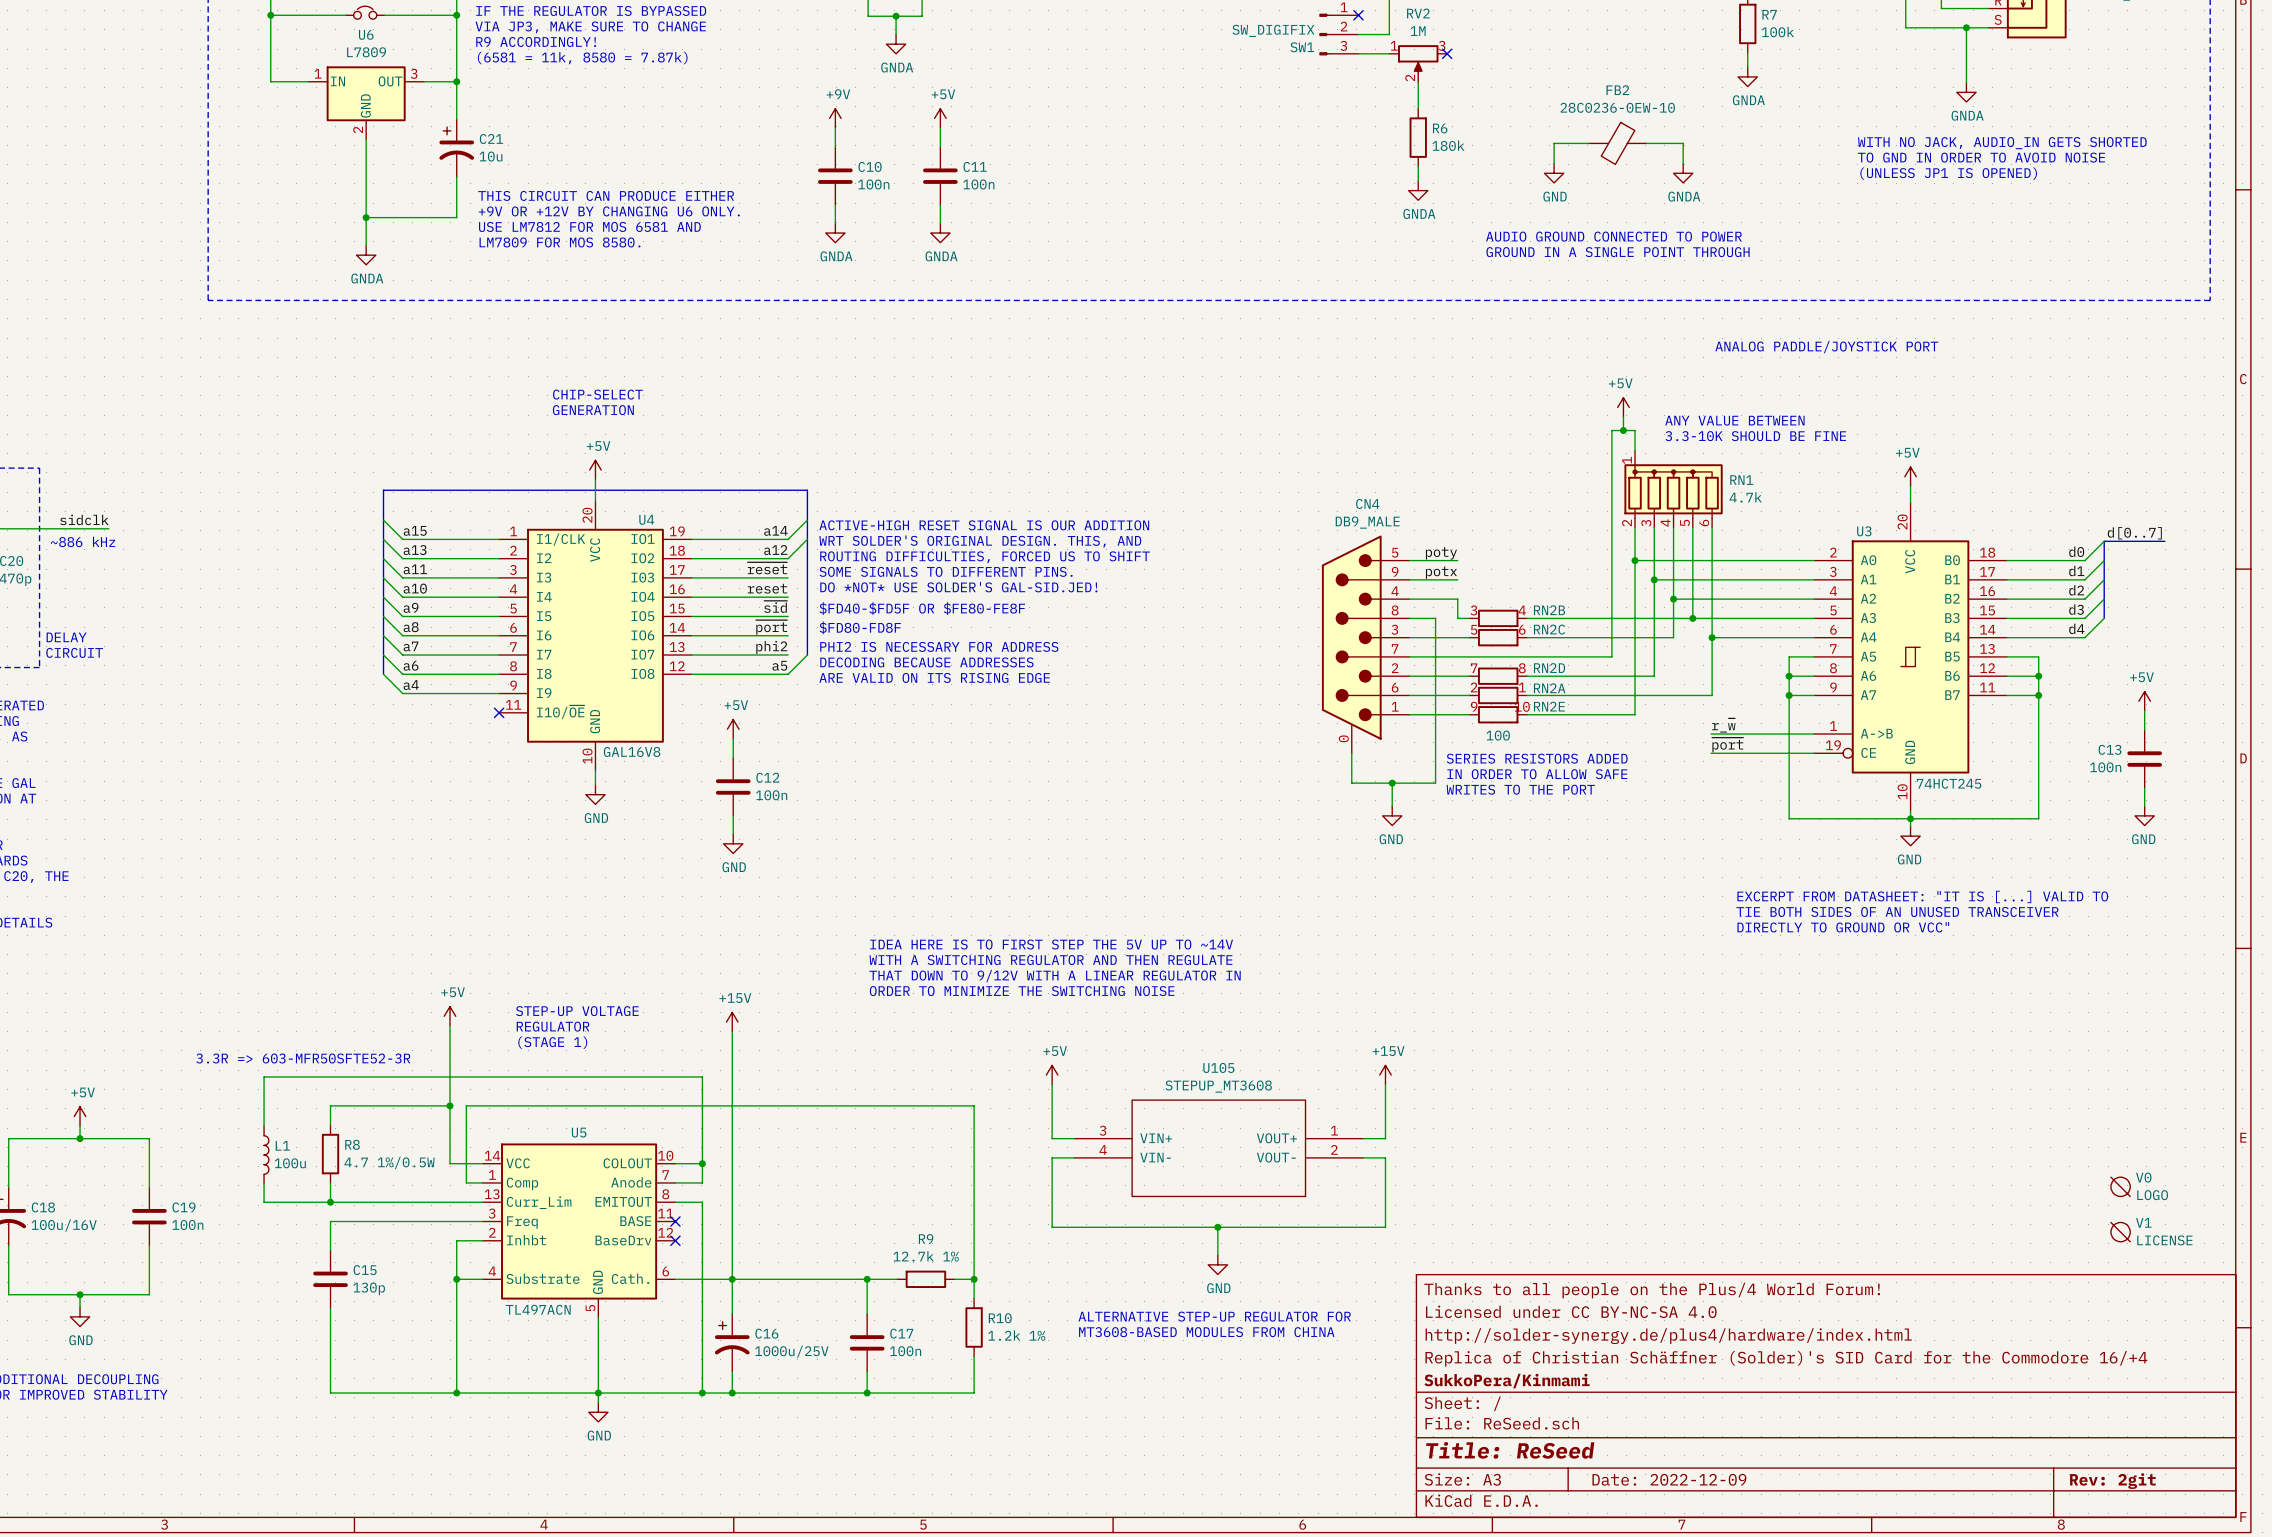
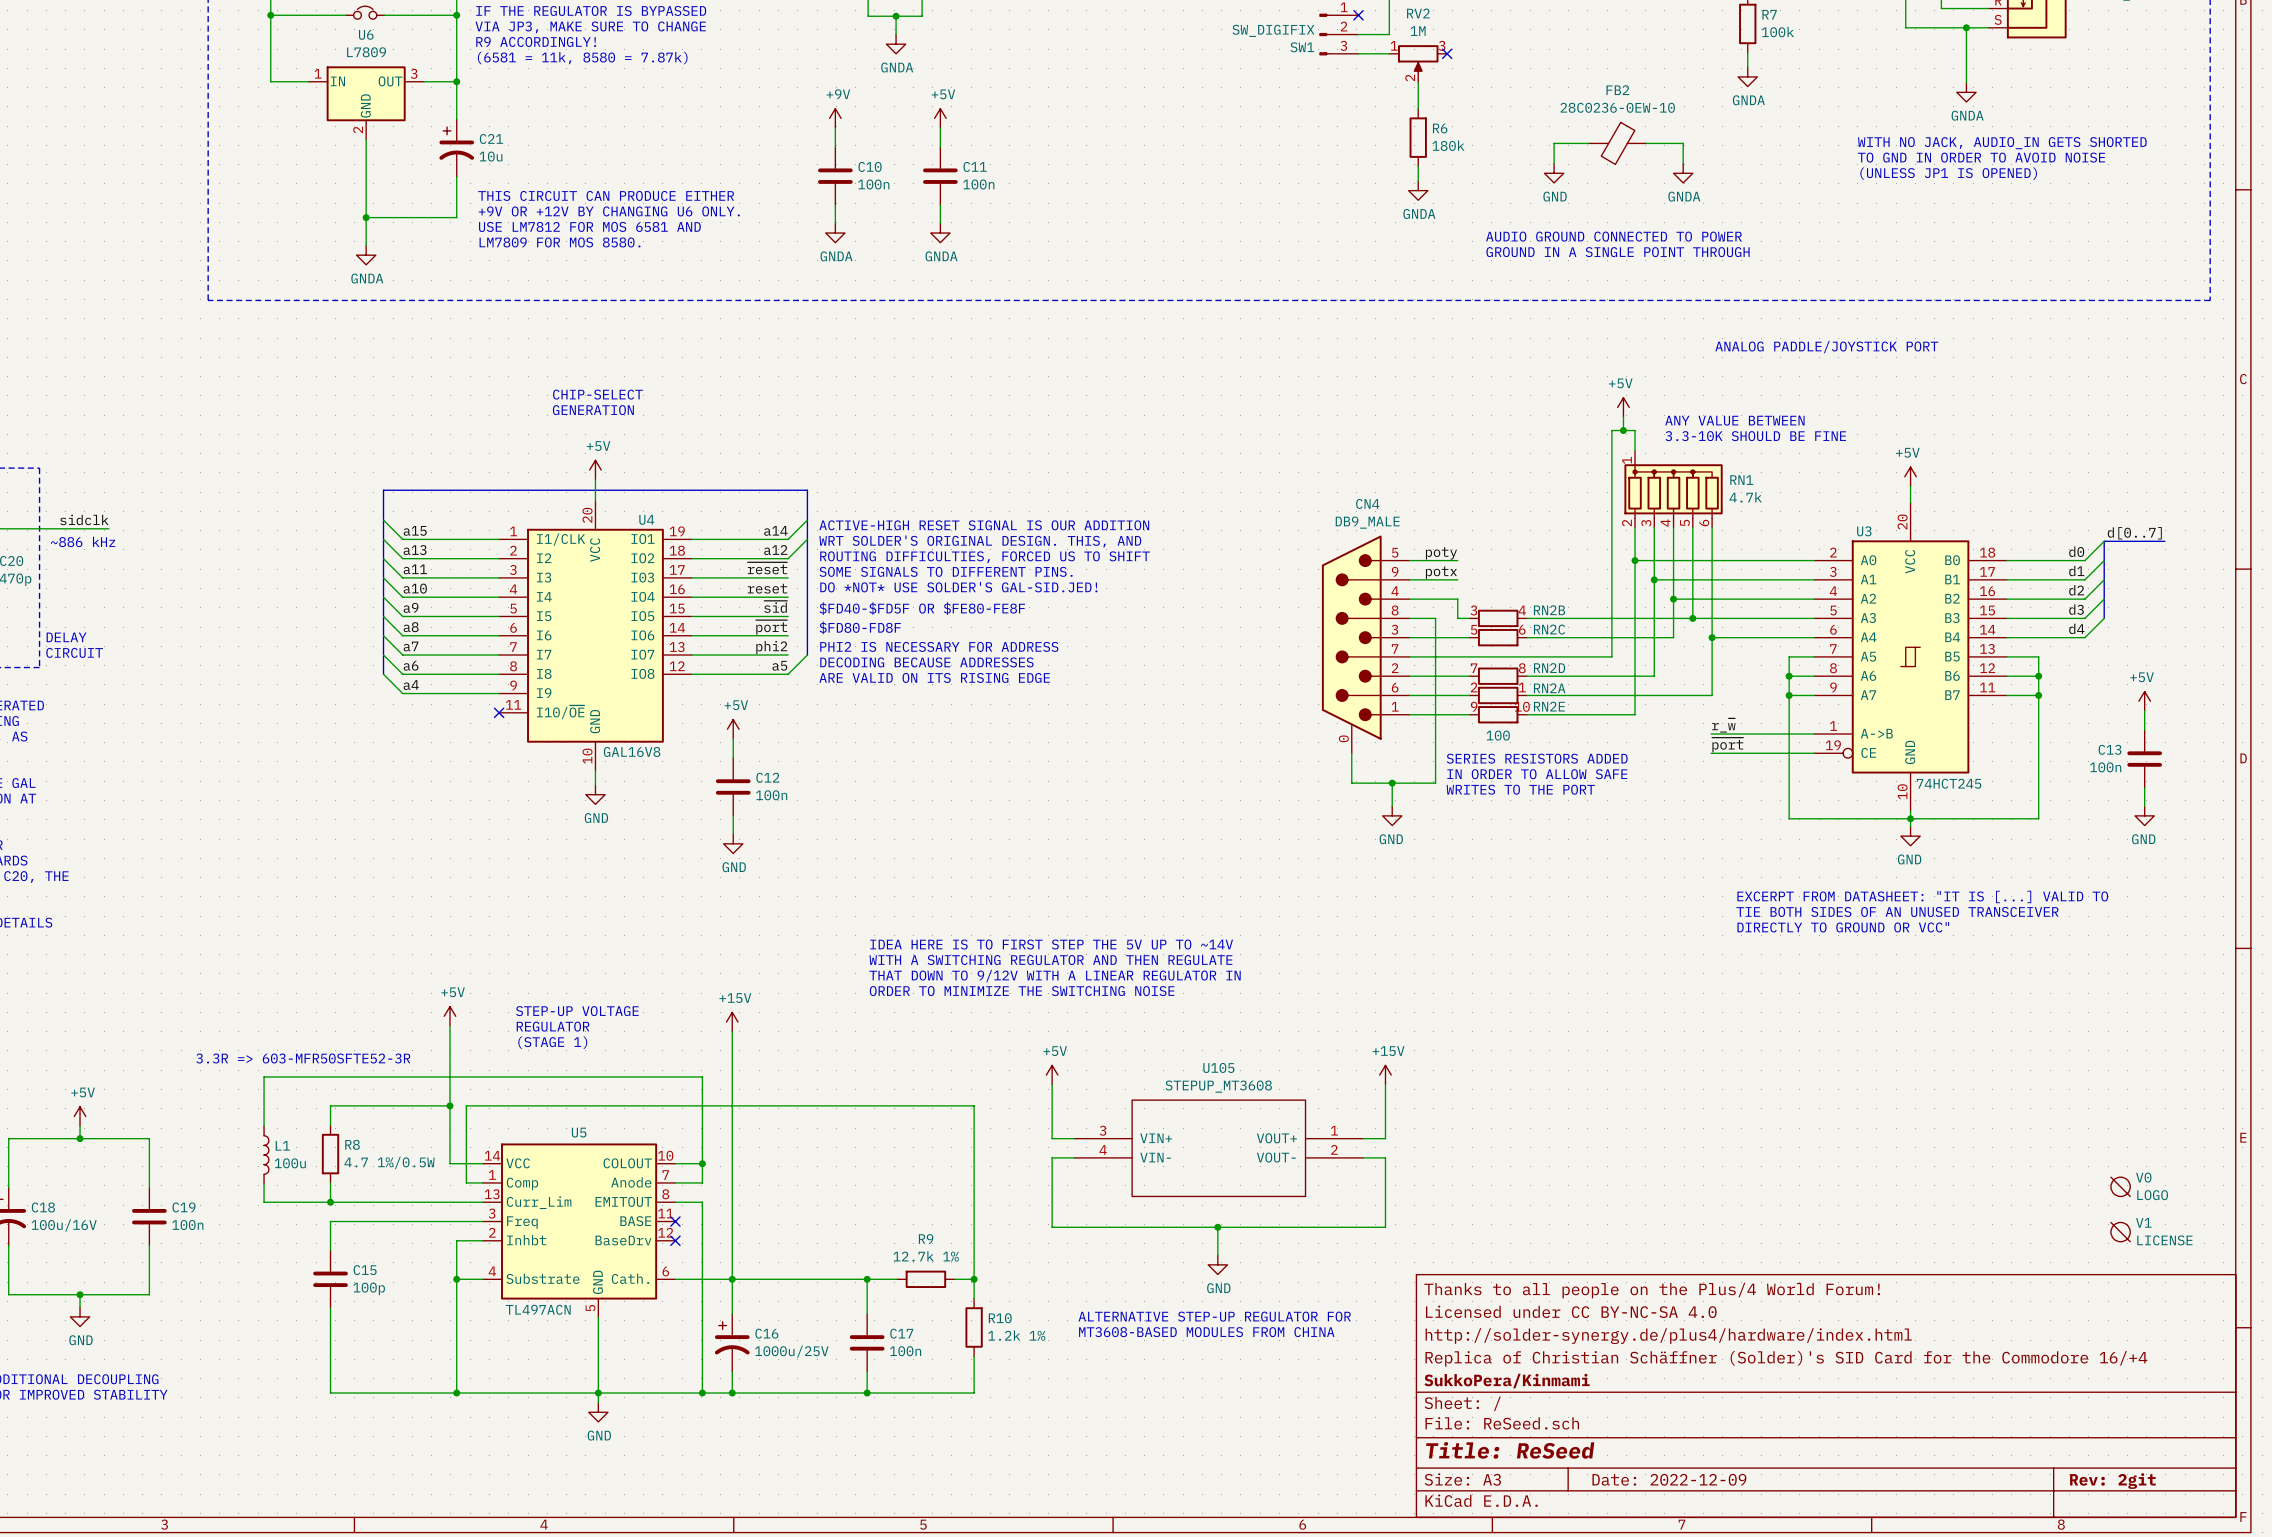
C15 value: 130p (369, 1288) -> 100p (369, 1288)

